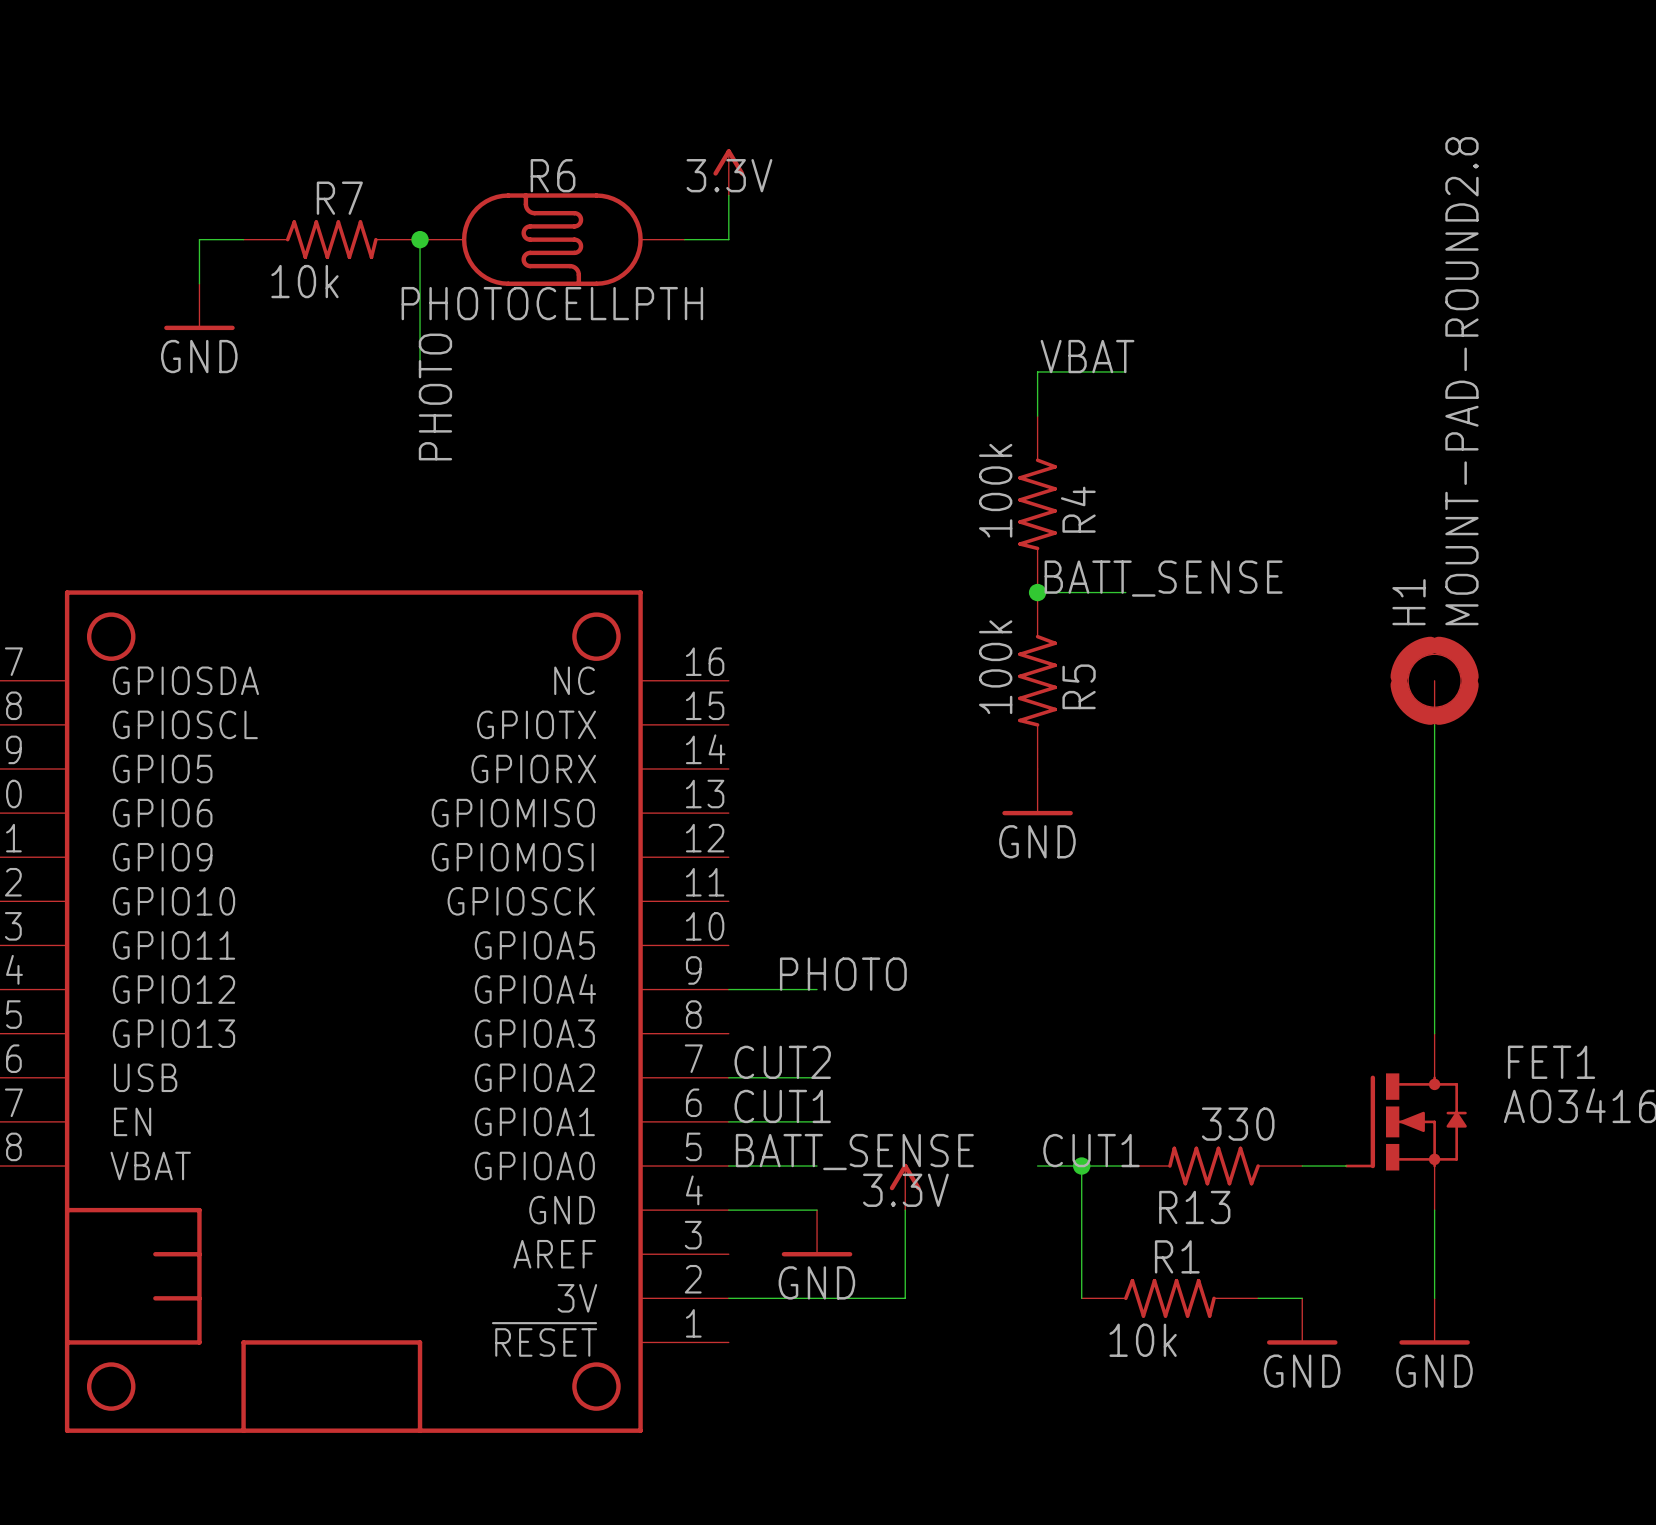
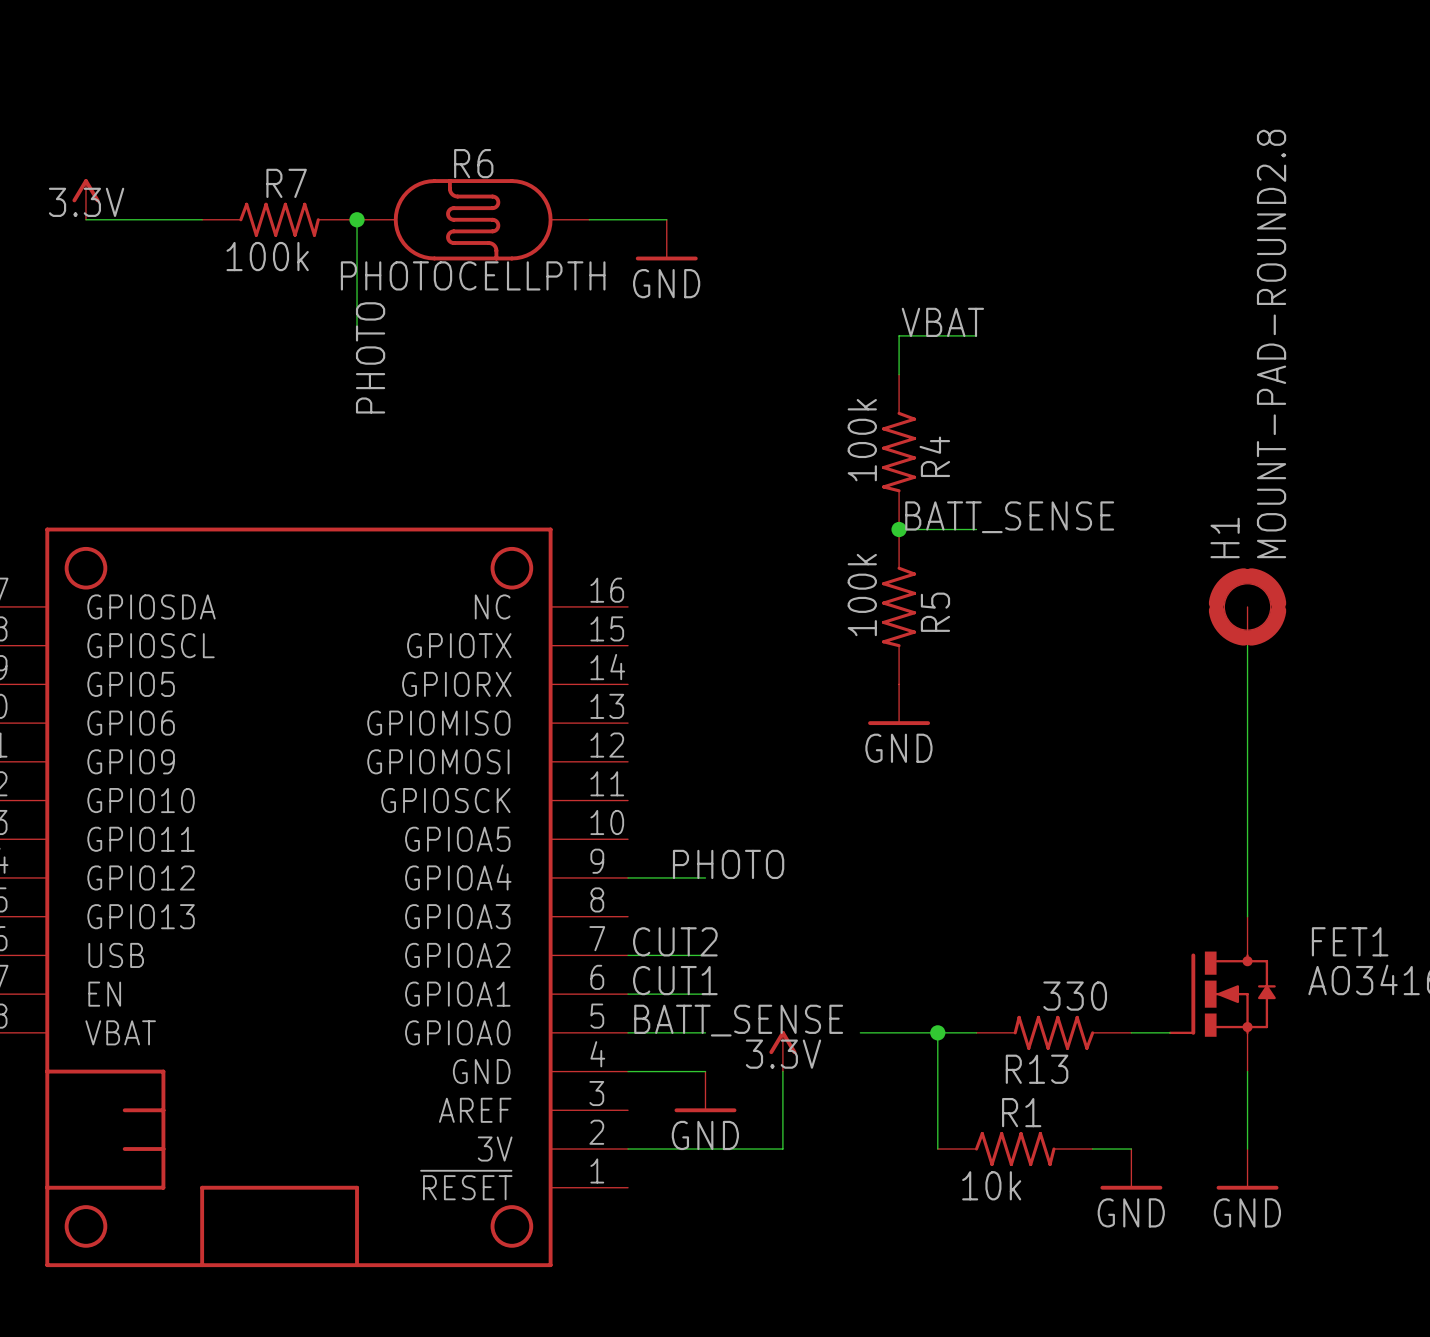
power symbol: 3.3V (728, 172) -> none
wire: (728, 195) (728, 239) -> (666, 219) (628, 219)
power symbol: none -> 3.3V (85, 199)
wire: (199, 239) (199, 283) -> (163, 219) (85, 219)
power symbol: none -> GND (666, 240)
R7 value: 10k (304, 281) -> 100k (267, 256)
power symbol: GND (199, 306) -> none
label: CUT1 (1091, 1150) -> none
wire: none -> (860, 1032) (899, 1032)

